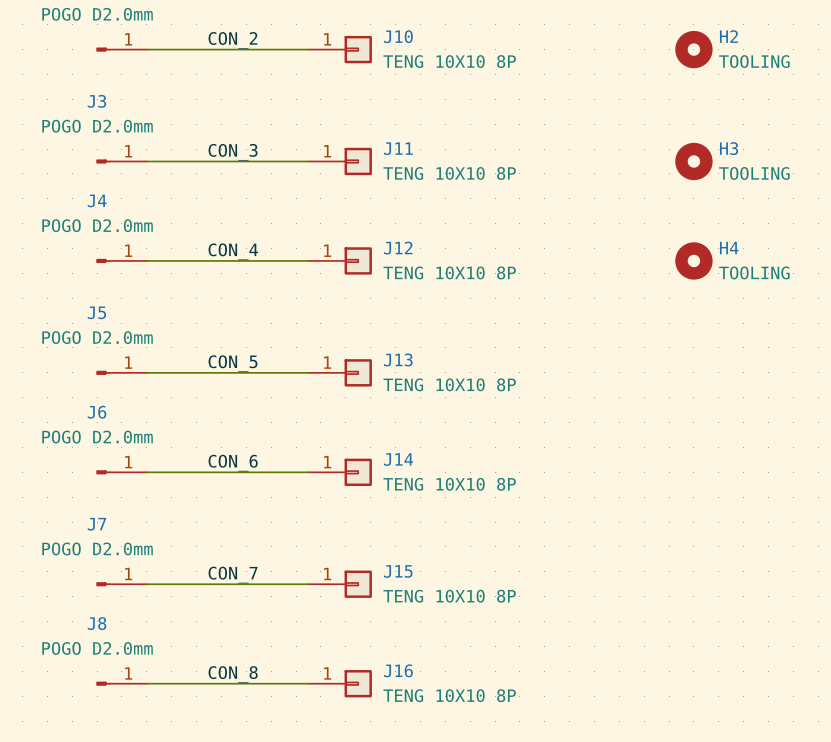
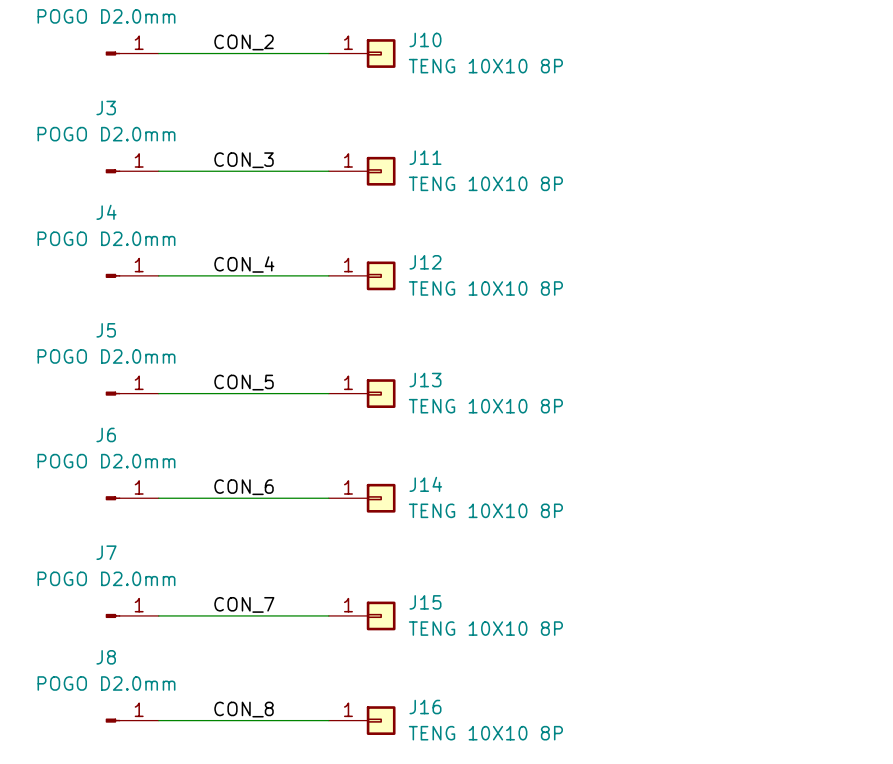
H2: TOOLING (693, 49) -> none
H3: TOOLING (693, 161) -> none
H4: TOOLING (693, 260) -> none

